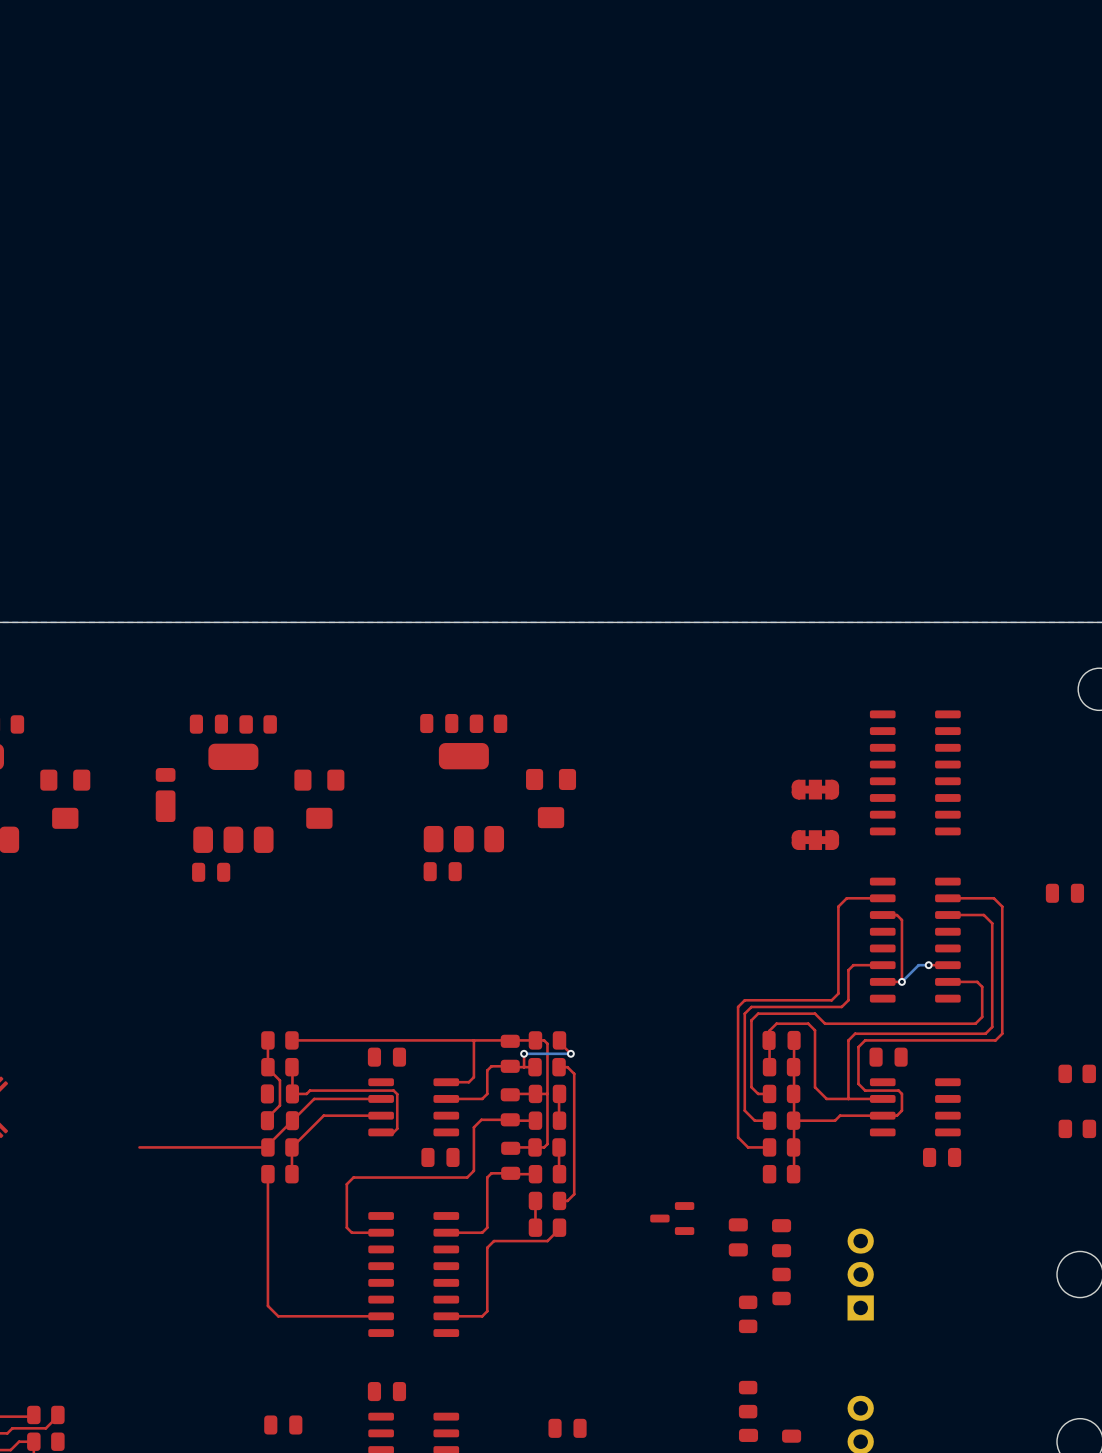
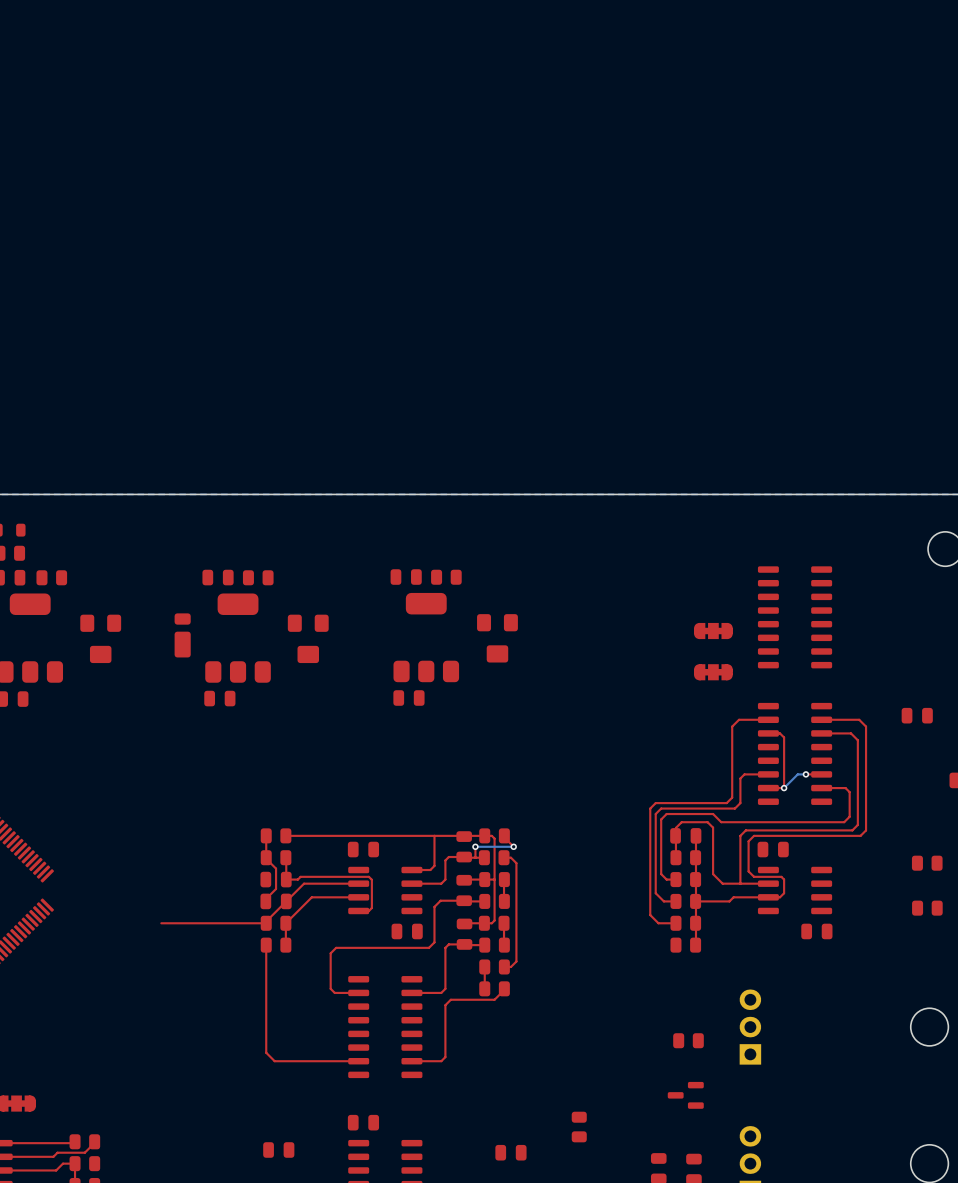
part position: (672, 1218) -> (685, 1095)
part: (738, 1237) -> none
part: (781, 1238) -> none
part rotation: 0° (781, 1286) -> 90° clockwise (688, 1040)
part: (748, 1314) -> none
part: none -> (579, 1127)
part: (748, 1399) -> none

